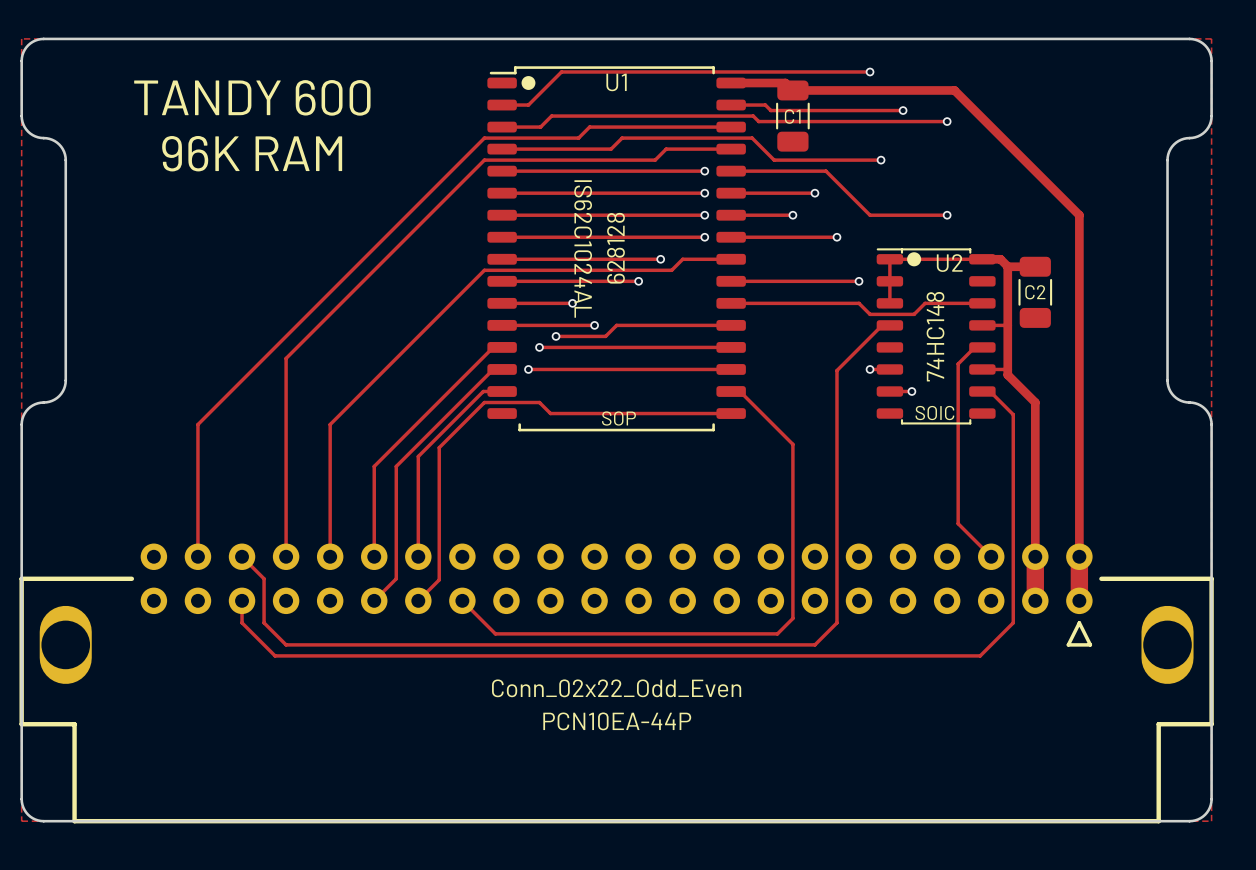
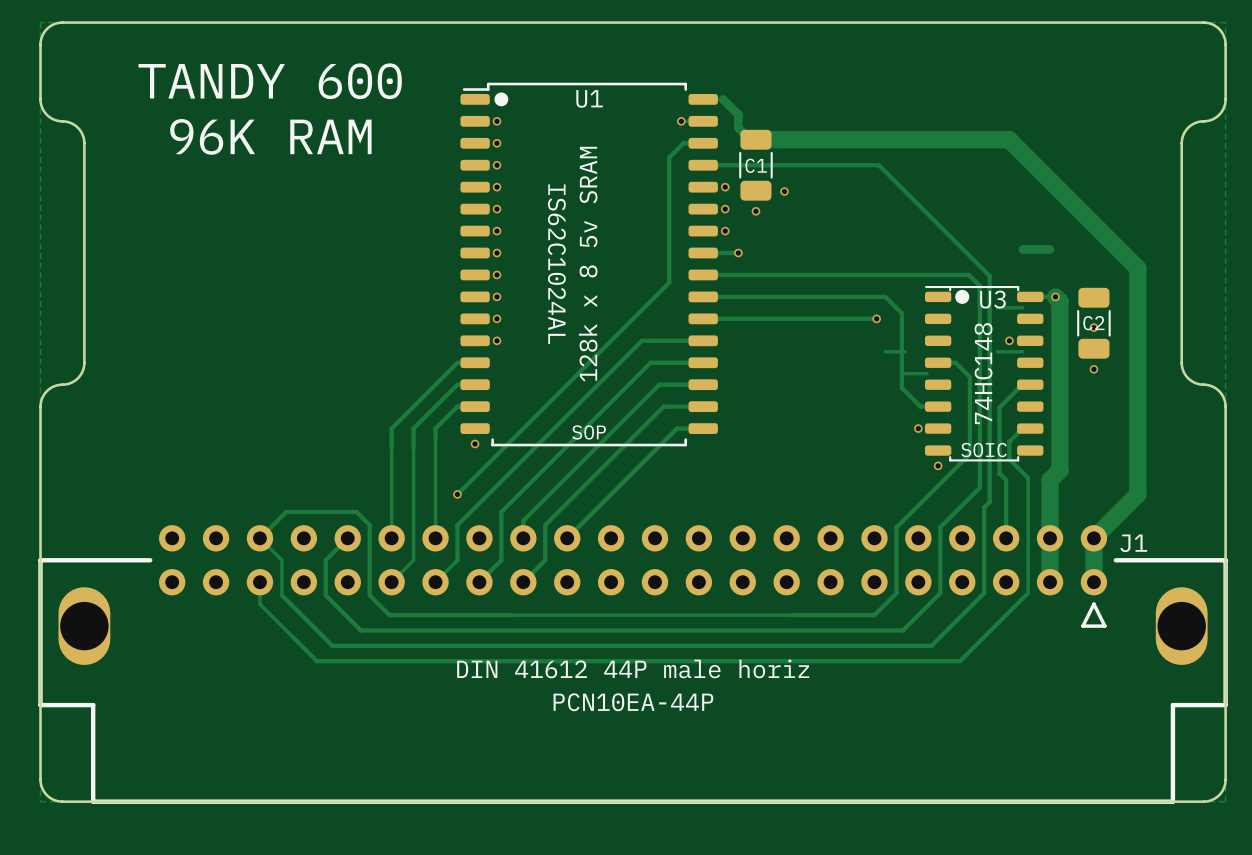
track: (870, 71) (561, 71) (528, 105) (502, 105) -> none
via: (870, 71) -> none
track: (731, 83) (785, 83) (792, 90) (954, 90) (1079, 215) (1079, 556) -> (723, 99) (738, 114) (738, 127) (750, 139) (1009, 139) (1137, 268) (1137, 494) (1093, 538)
track: (731, 105) (765, 105) (770, 110) (903, 110) -> none
via: (903, 110) -> none
track: (687, 116) (551, 116) (540, 127) (502, 127) -> none
track: (706, 116) (753, 116) (758, 121) (947, 121) -> none
C1 position: (792, 116) -> (755, 165)
via: (947, 121) -> none
track: (731, 127) (589, 127) (578, 138) (484, 138) (197, 424) (197, 556) -> none
via: none -> (496, 121)
track: (665, 138) (622, 138) (611, 149) (502, 149) -> none
via: none -> (681, 121)
track: (687, 138) (752, 138) (774, 160) (881, 160) -> none
track: (731, 149) (666, 149) (655, 160) (484, 160) (286, 358) (286, 556) -> none
via: none -> (496, 143)
track: none -> (703, 143) (683, 143) (669, 157) (669, 282) (457, 494)
via: (881, 160) -> none
track: (502, 171) (704, 171) -> none
via: (704, 171) -> none
track: (731, 171) (825, 171) (870, 215) (947, 215) -> none
via: none -> (496, 165)
track: (502, 193) (704, 193) -> none
via: (704, 193) -> none
track: (731, 193) (814, 193) -> none
via: (814, 193) -> none
via: none -> (496, 187)
via: none -> (725, 187)
via: none -> (784, 191)
track: (502, 215) (704, 215) -> none
via: (704, 215) -> none
track: (731, 215) (792, 215) -> none
via: (792, 215) -> none
via: (947, 215) -> none
via: none -> (496, 209)
via: none -> (725, 209)
via: none -> (755, 211)
track: (502, 237) (704, 237) -> none
via: (704, 237) -> none
track: (731, 237) (836, 237) -> none
via: (836, 237) -> none
via: none -> (496, 231)
text position: IS62C1024AL (583, 248) -> IS62C1024AL (556, 264)
U1 value: 628128 (615, 248) -> 128k x 8 5v SRAM (588, 264)
U1 position: (616, 248) -> (589, 264)
via: none -> (725, 231)
track: (502, 259) (660, 259) -> none
via: (660, 259) -> none
track: (731, 259) (682, 259) (671, 270) (484, 270) (330, 424) (330, 556) -> (703, 274) (968, 274) (979, 285) (979, 487) (940, 527) (940, 593) (902, 630) (360, 630) (325, 595) (325, 560) (347, 538)
via: none -> (496, 253)
track: none -> (703, 253) (738, 253)
via: none -> (738, 253)
track: (502, 281) (638, 281) -> none
via: (638, 281) -> none
track: (731, 281) (859, 281) -> none
via: (859, 281) -> none
via: none -> (496, 274)
C2 position: (1035, 292) -> (1093, 323)
track: (502, 303) (572, 303) -> none
via: (572, 303) -> none
track: (731, 303) (859, 303) (870, 314) (914, 314) (925, 303) (982, 303) -> none
track: (889, 303) (889, 259) (1000, 259) (1008, 266) (1007, 374) (1035, 402) (1035, 498) -> (1030, 296) (1055, 296) (1059, 301) (1059, 470) (1050, 480)
via: none -> (496, 296)
track: none -> (703, 296) (885, 296) (901, 313) (901, 387) (920, 406) (937, 406)
via: none -> (1055, 296)
track: (502, 325) (594, 325) -> none
via: (594, 325) -> none
track: (731, 325) (616, 325) (605, 336) (556, 336) -> none
track: (889, 325) (882, 325) (836, 370) (836, 622) (814, 644) (286, 644) (264, 622) (264, 614) -> (703, 165) (878, 165) (989, 276) (989, 502) (984, 507) (984, 593) (931, 645) (332, 645) (281, 595)
via: none -> (496, 318)
via: (556, 336) -> none
track: none -> (703, 318) (876, 318)
via: none -> (876, 318)
U2: 74HC148 (936, 336) -> none
via: none -> (1093, 327)
track: (502, 347) (493, 347) (374, 466) -> (475, 362) (457, 362) (391, 428) (391, 448)
track: (539, 347) (731, 347) -> none
via: (539, 347) -> none
track: (982, 347) (974, 347) (958, 363) (958, 523) (991, 556) -> (1030, 384) (1022, 384) (999, 407) (999, 473) (1006, 480) (1006, 538)
via: none -> (496, 340)
via: none -> (1009, 340)
track: (502, 369) (493, 369) (396, 466) -> (475, 384) (457, 384) (413, 428) (413, 448)
track: (528, 369) (731, 369) -> none
via: (528, 369) -> none
via: (870, 369) -> none
track: none -> (703, 362) (650, 362) (501, 511) (501, 560) (479, 582)
via: none -> (1093, 369)
track: (502, 391) (483, 391) (418, 456) -> (475, 406) (457, 406) (435, 428) (435, 438)
track: (731, 391) (740, 391) (792, 444) (792, 618) (777, 633) -> (937, 362) (955, 362) (969, 377) (969, 454) (896, 527) (896, 593) (874, 615) (793, 615)
via: (911, 391) -> none
U3: none -> 74HC148 (984, 373)
track: (982, 391) (990, 391) (1013, 414) (1013, 496) -> (1030, 428) (1022, 428) (1009, 441) (1009, 459) (1028, 477)
track: none -> (703, 384) (659, 384) (523, 520) (523, 538)
track: (731, 413) (550, 413) (539, 402) (484, 402) (439, 447) (439, 579) -> (703, 340) (641, 340) (457, 525) (456, 561)
text position: SOIC (934, 413) -> SOIC (984, 450)
text position: SOP (618, 418) -> SOP (589, 432)
track: none -> (703, 406) (663, 406) (545, 525) (545, 560) (523, 582)
track: none -> (703, 428) (676, 428) (567, 538)
via: none -> (918, 428)
via: none -> (475, 443)
via: none -> (938, 465)
track width: thin (1035, 498) (1035, 556) -> thick (1050, 480) (1050, 538)
via: none -> (457, 494)
J1 name: none -> J1 (1133, 543)
track: (462, 600) (495, 633) -> (259, 538) (286, 511) (356, 511) (369, 525) (369, 595) (389, 615) (512, 615)
track: (1013, 611) (1013, 622) (980, 655) (275, 655) -> (1028, 593) (960, 661) (317, 661) (292, 637)
J1 value: Conn_02x22_Odd_Even (616, 688) -> DIN 41612 44P male horiz (633, 668)

